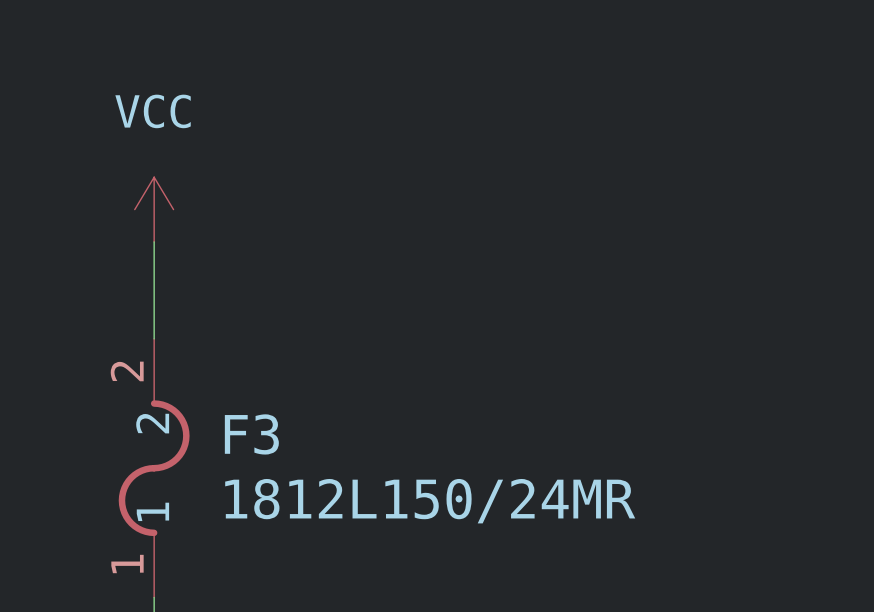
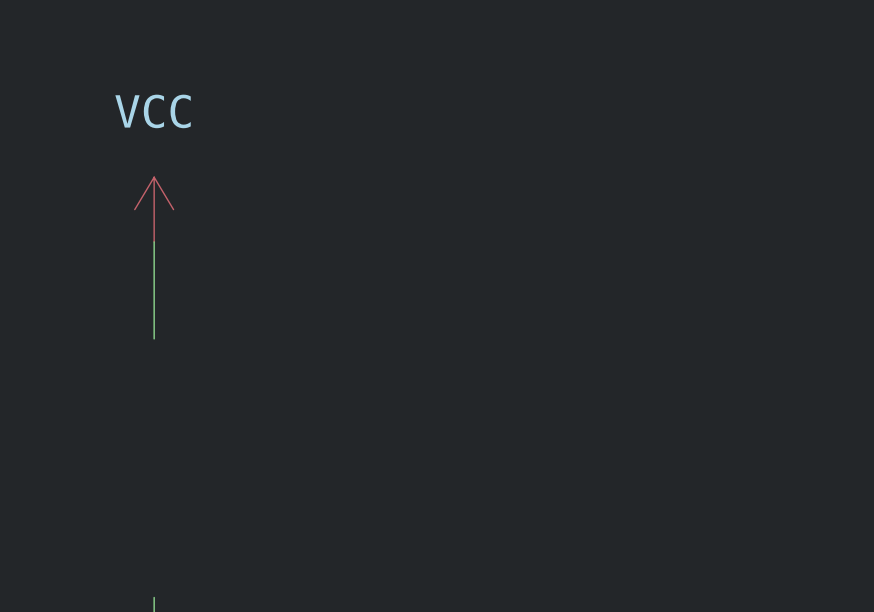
F3: 1812L150/24MR (154, 468) -> none

